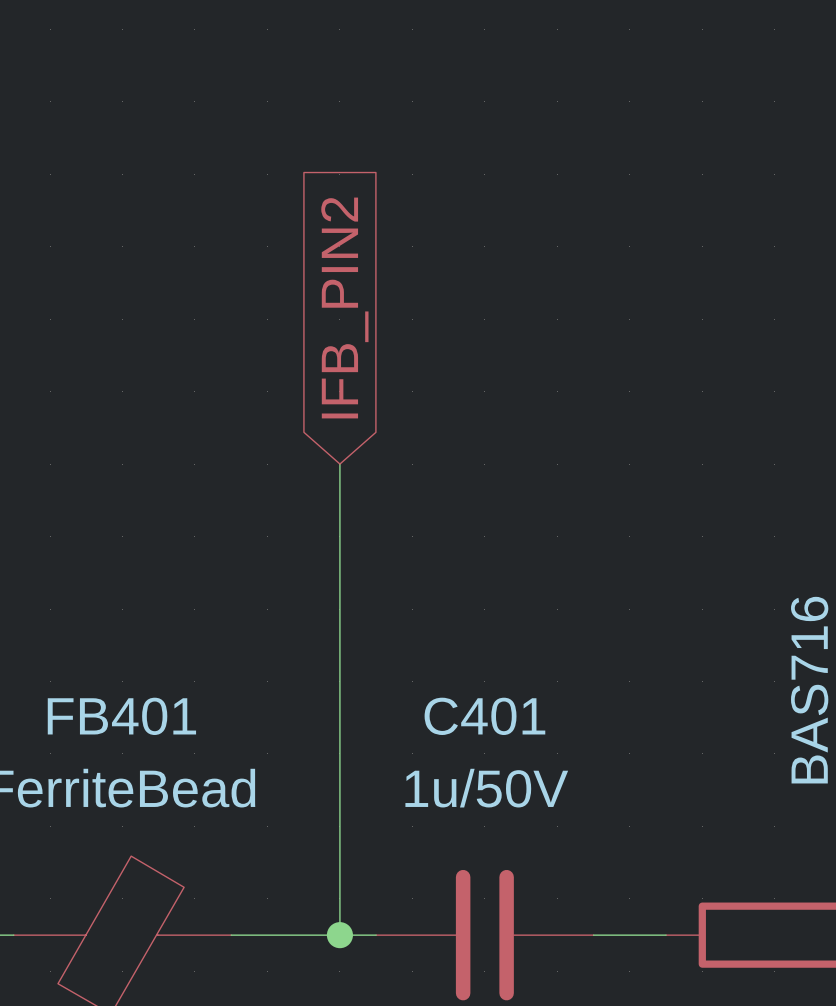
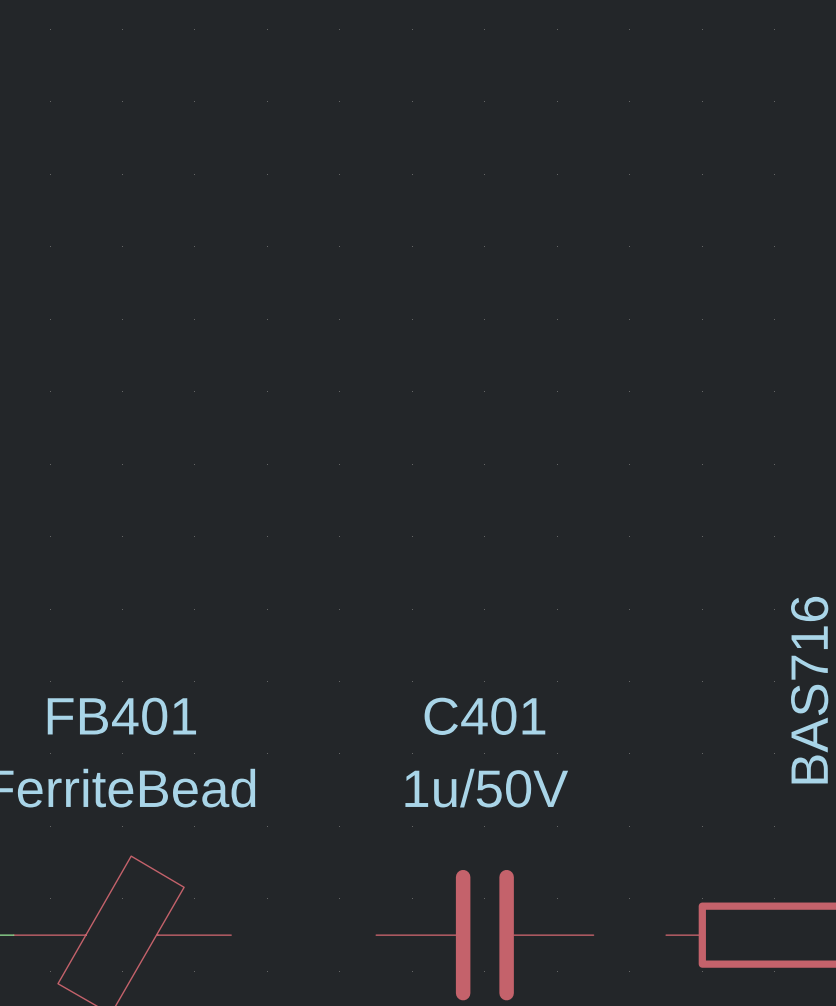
global label: IFB_PIN2 (344, 307) -> none
wire: (339, 464) (339, 935) -> none
wire: (231, 935) (376, 935) -> none
junction: (339, 935) -> none
wire: (593, 935) (666, 935) -> none

